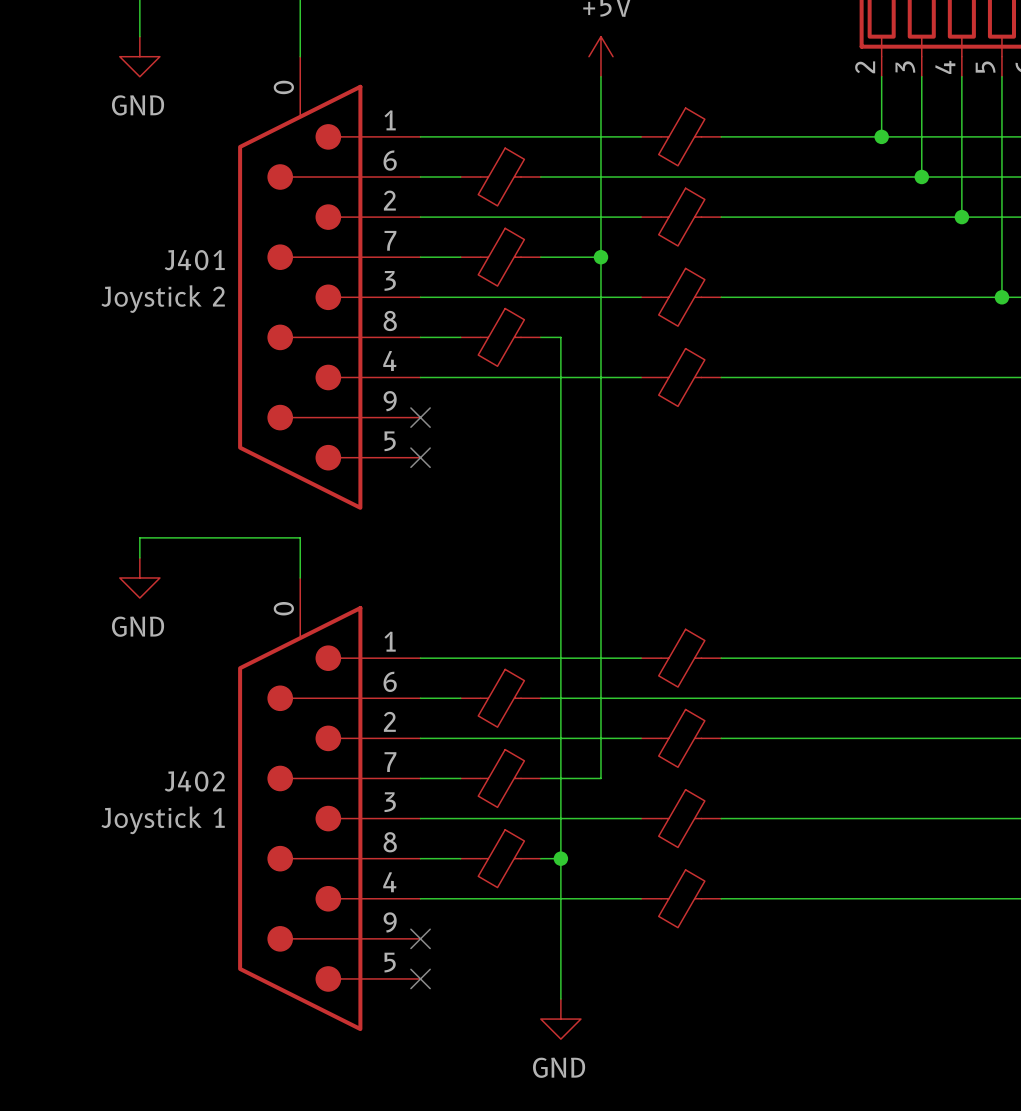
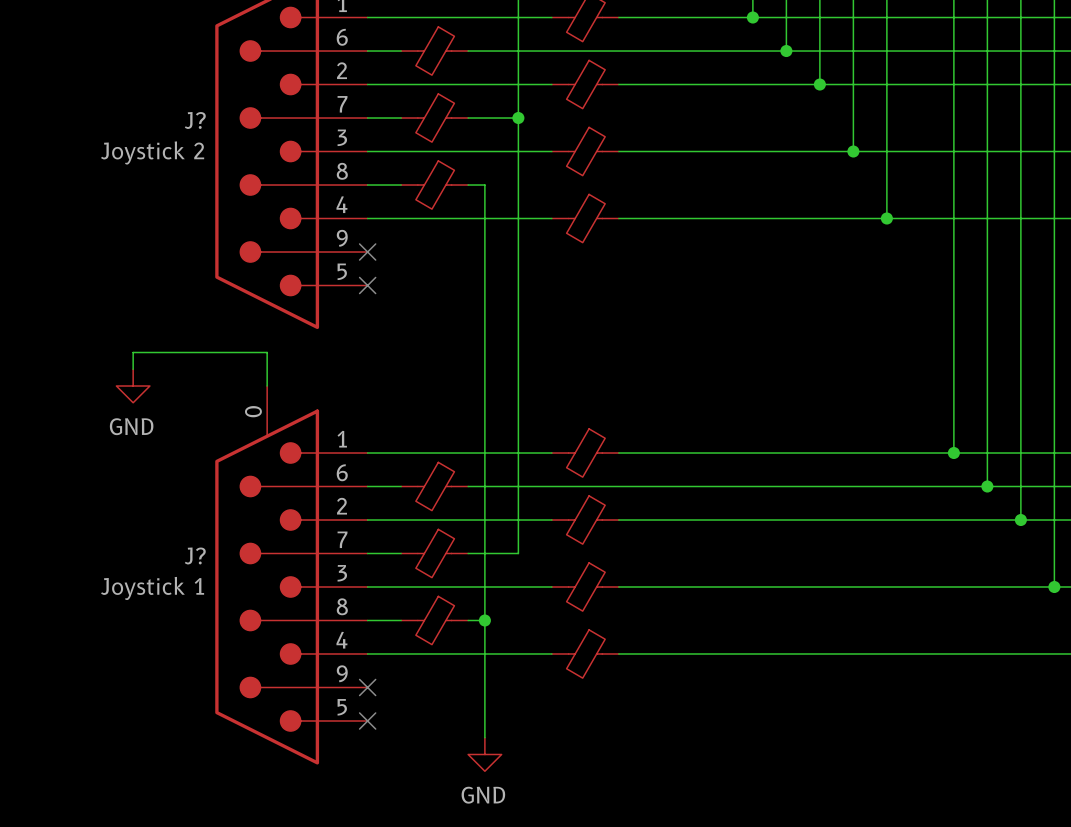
J401 name: J401 (194, 260) -> J? (195, 120)
J402 name: J402 (194, 781) -> J? (195, 555)

